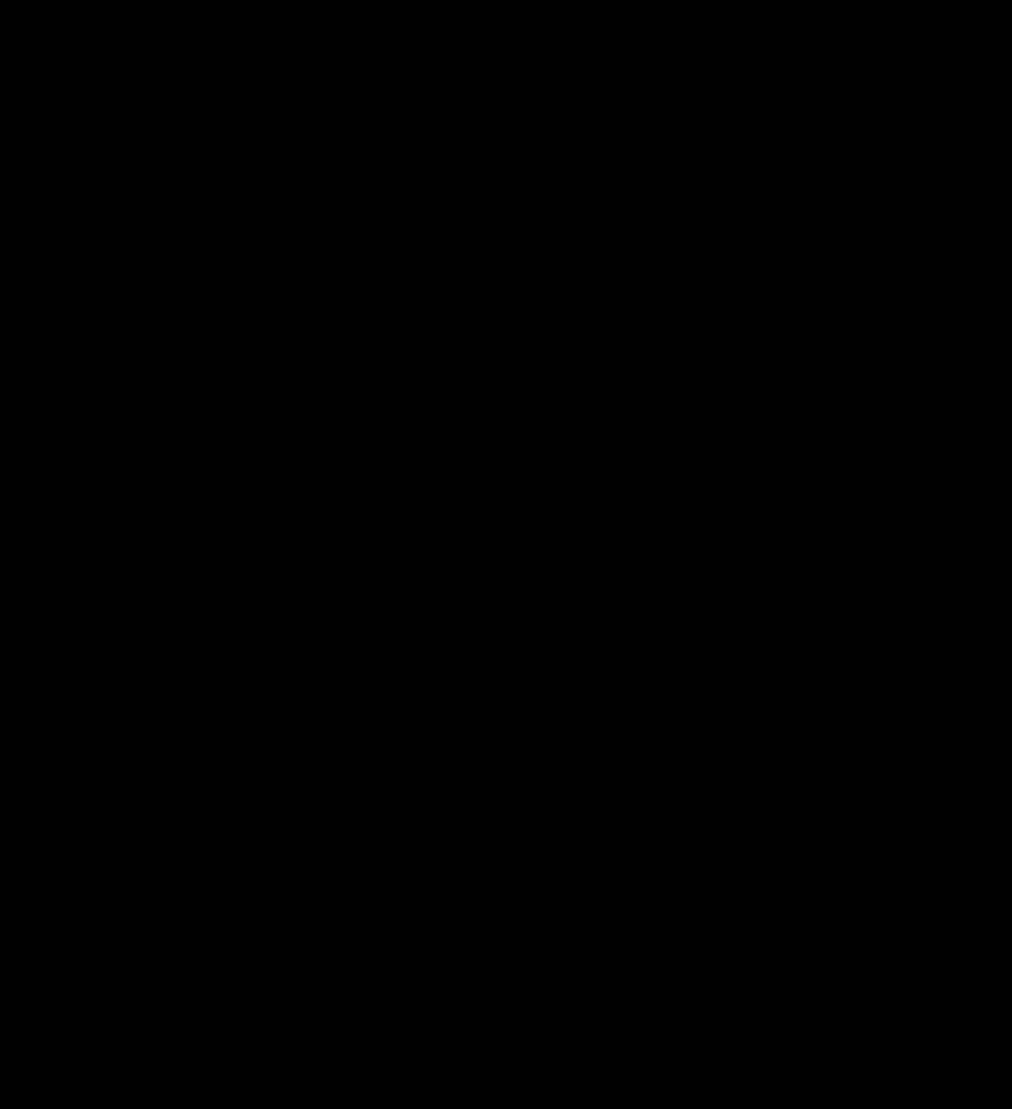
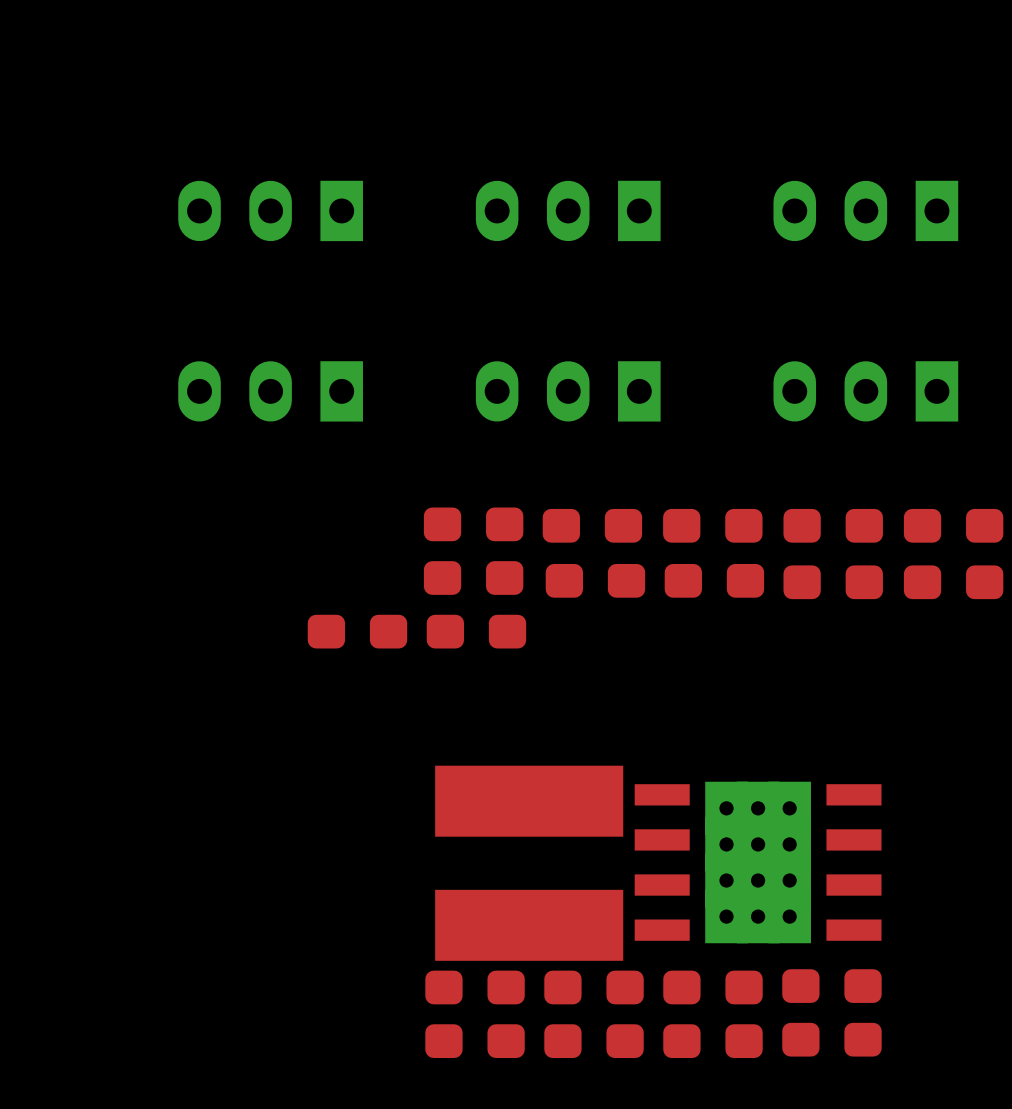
part: none -> (270, 210)
part: none -> (568, 210)
part: none -> (865, 210)
part: none -> (270, 391)
part: none -> (568, 391)
part: none -> (865, 391)
part: none -> (473, 524)
part: none -> (592, 525)
part: none -> (712, 525)
part: none -> (833, 525)
part: none -> (953, 525)
part: none -> (473, 578)
part: none -> (595, 580)
part: none -> (714, 580)
part: none -> (833, 582)
part: none -> (953, 582)
part: none -> (357, 631)
part: none -> (476, 631)
part: none -> (758, 862)
part: none -> (529, 863)
part: none -> (831, 986)
part: none -> (475, 987)
part: none -> (594, 987)
part: none -> (712, 987)
part: none -> (831, 1039)
part: none -> (475, 1041)
part: none -> (594, 1041)
part: none -> (712, 1041)

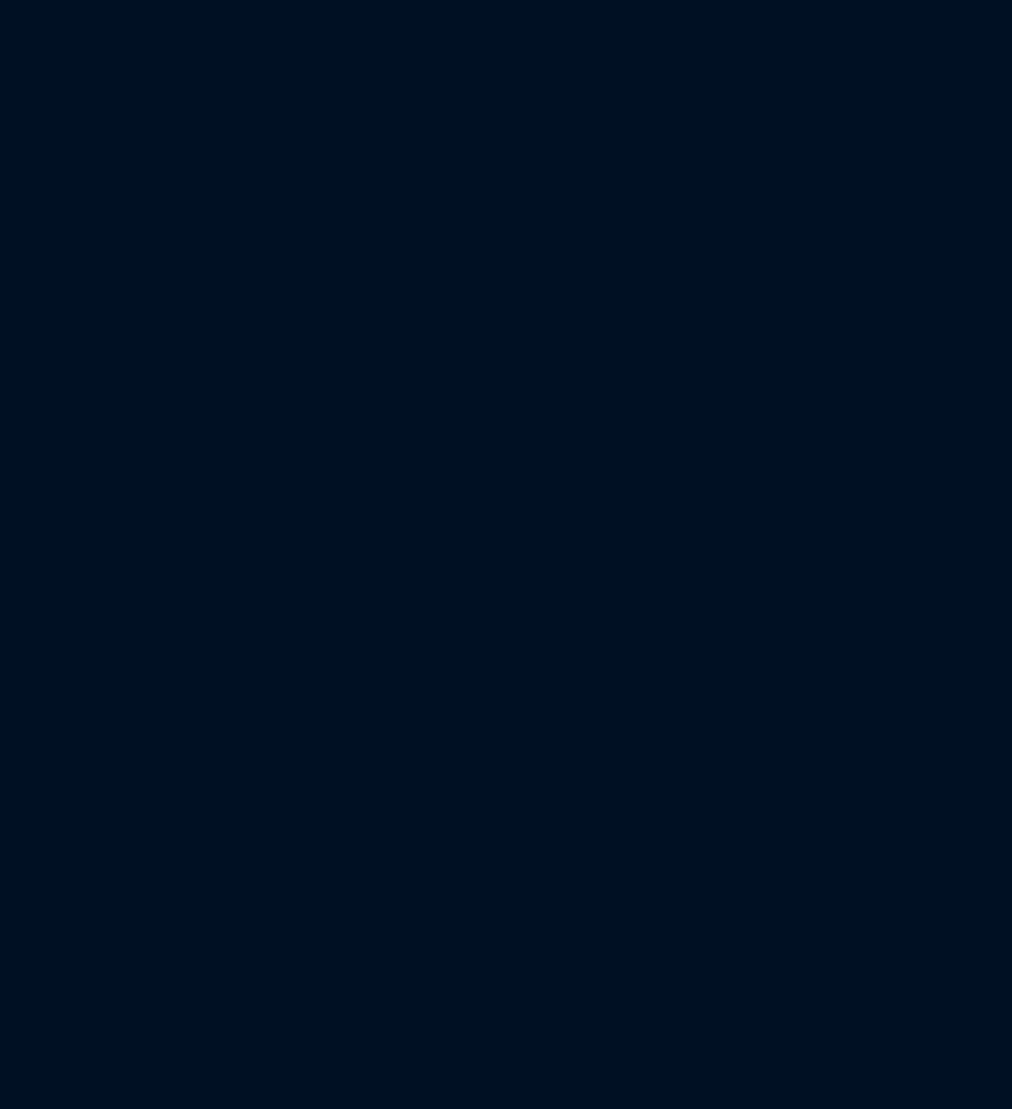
part: (270, 210) -> none
part: (568, 210) -> none
part: (865, 210) -> none
part: (270, 391) -> none
part: (568, 391) -> none
part: (865, 391) -> none
part: (473, 524) -> none
part: (592, 525) -> none
part: (712, 525) -> none
part: (833, 525) -> none
part: (953, 525) -> none
part: (473, 578) -> none
part: (595, 580) -> none
part: (714, 580) -> none
part: (833, 582) -> none
part: (953, 582) -> none
part: (357, 631) -> none
part: (476, 631) -> none
part: (758, 862) -> none
part: (529, 863) -> none
part: (831, 986) -> none
part: (475, 987) -> none
part: (594, 987) -> none
part: (712, 987) -> none
part: (831, 1039) -> none
part: (475, 1041) -> none
part: (594, 1041) -> none
part: (712, 1041) -> none

